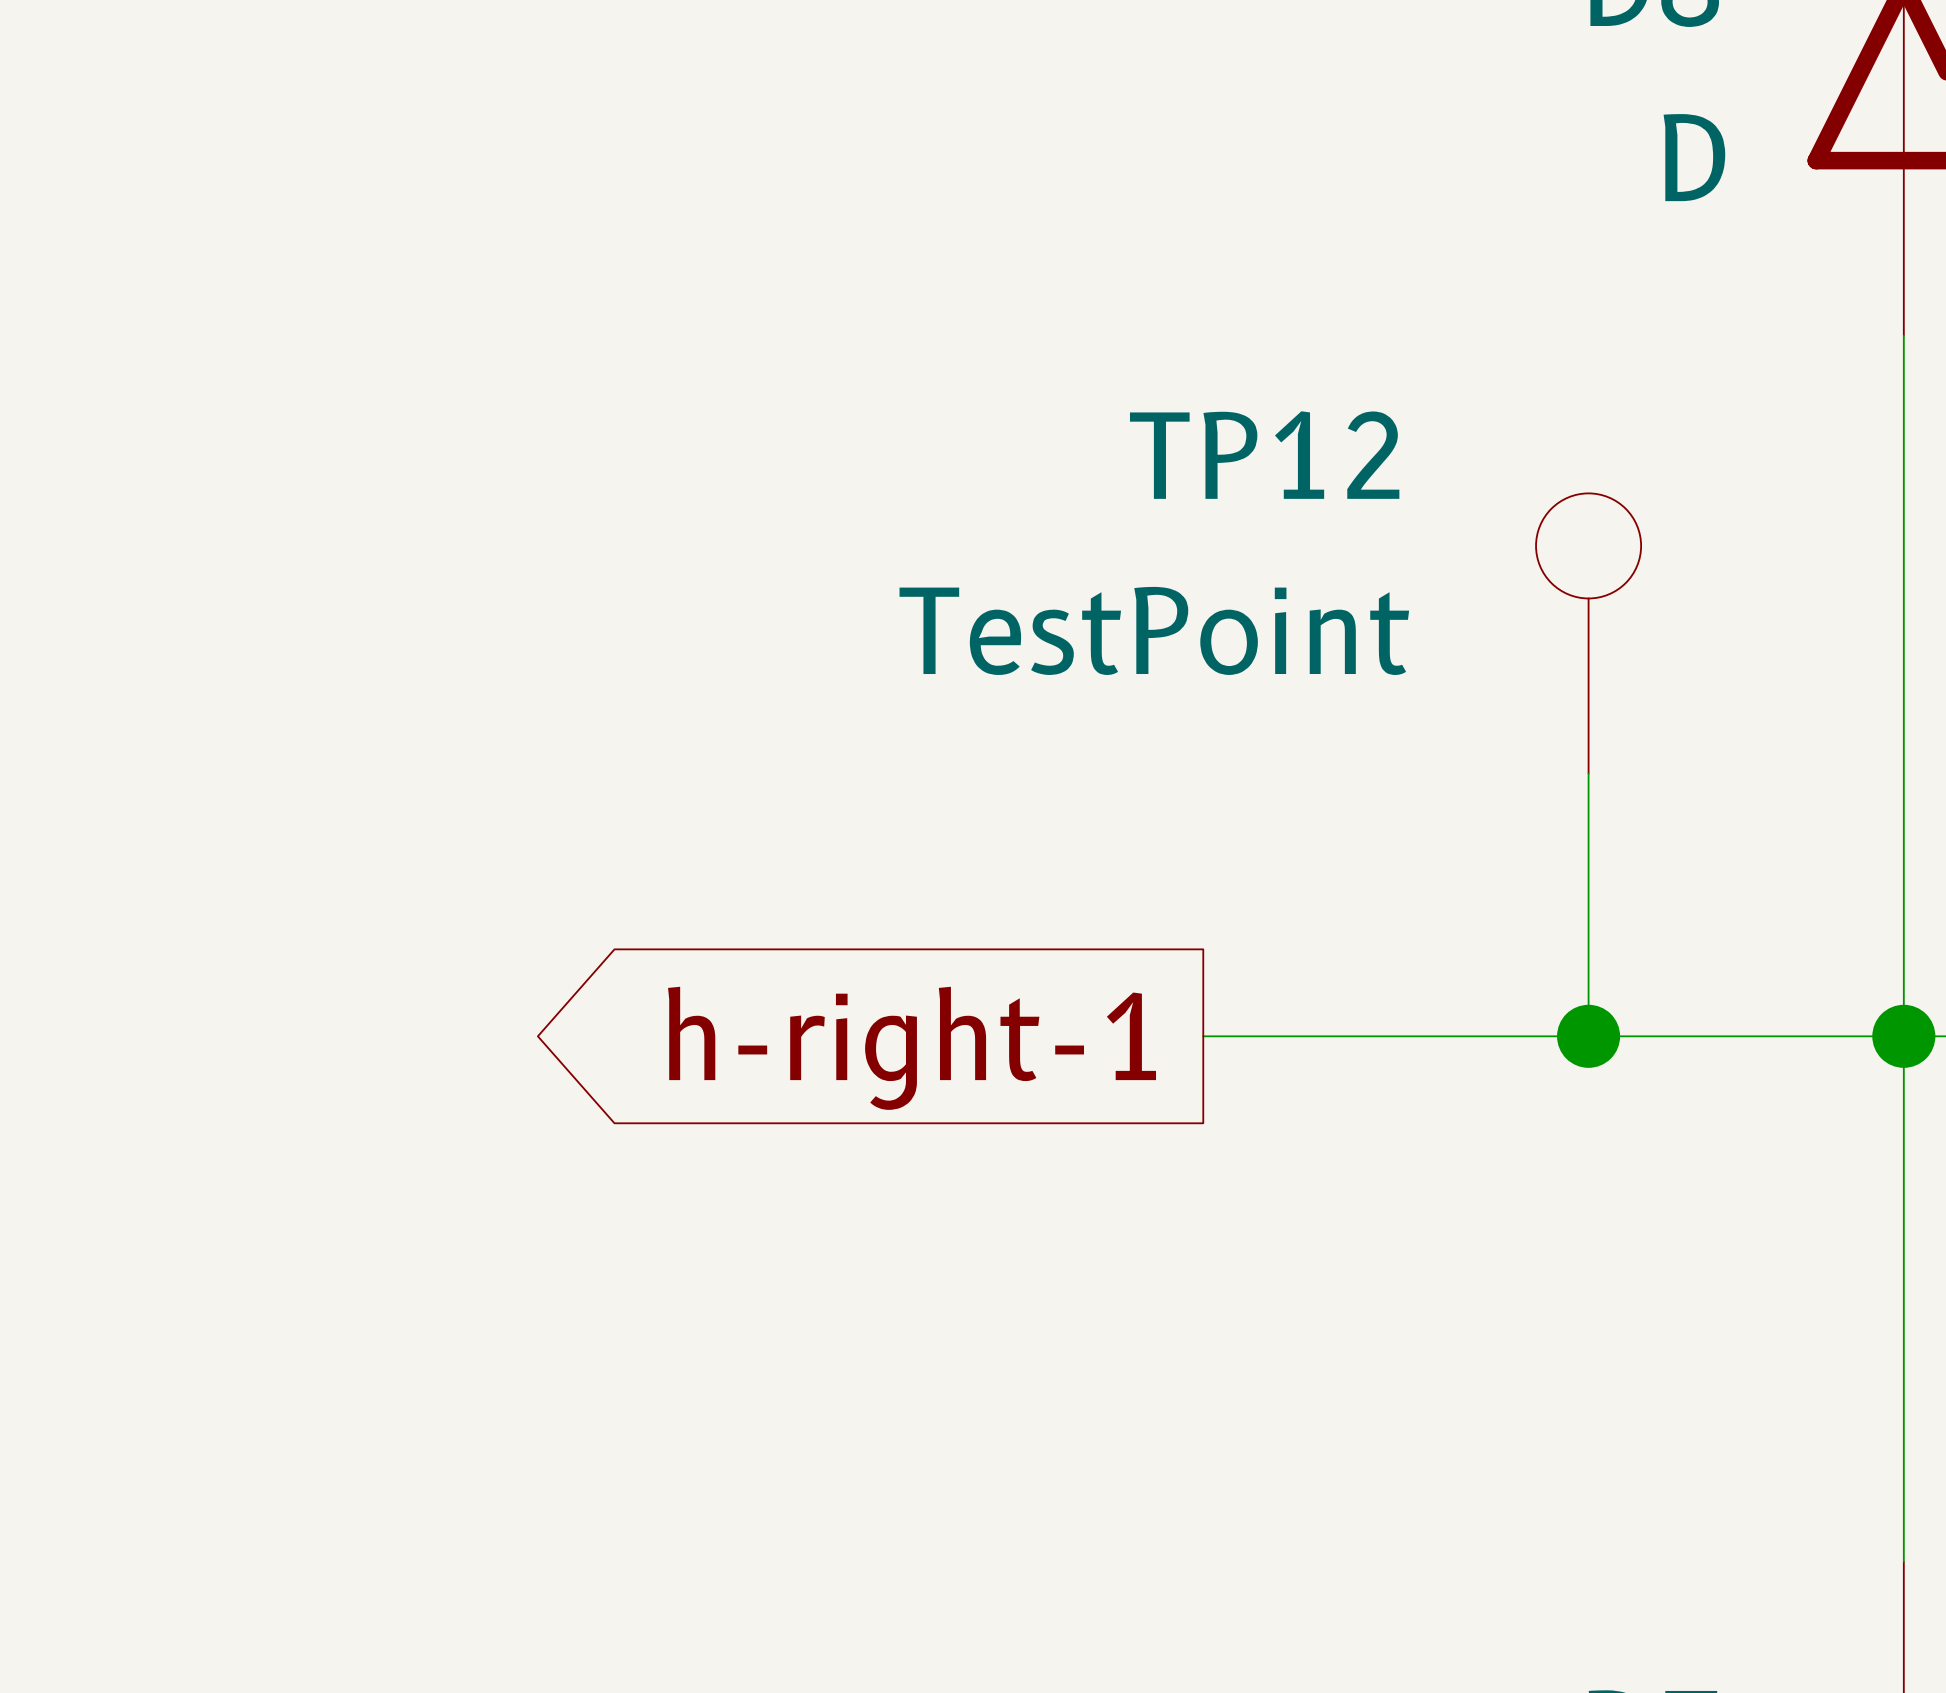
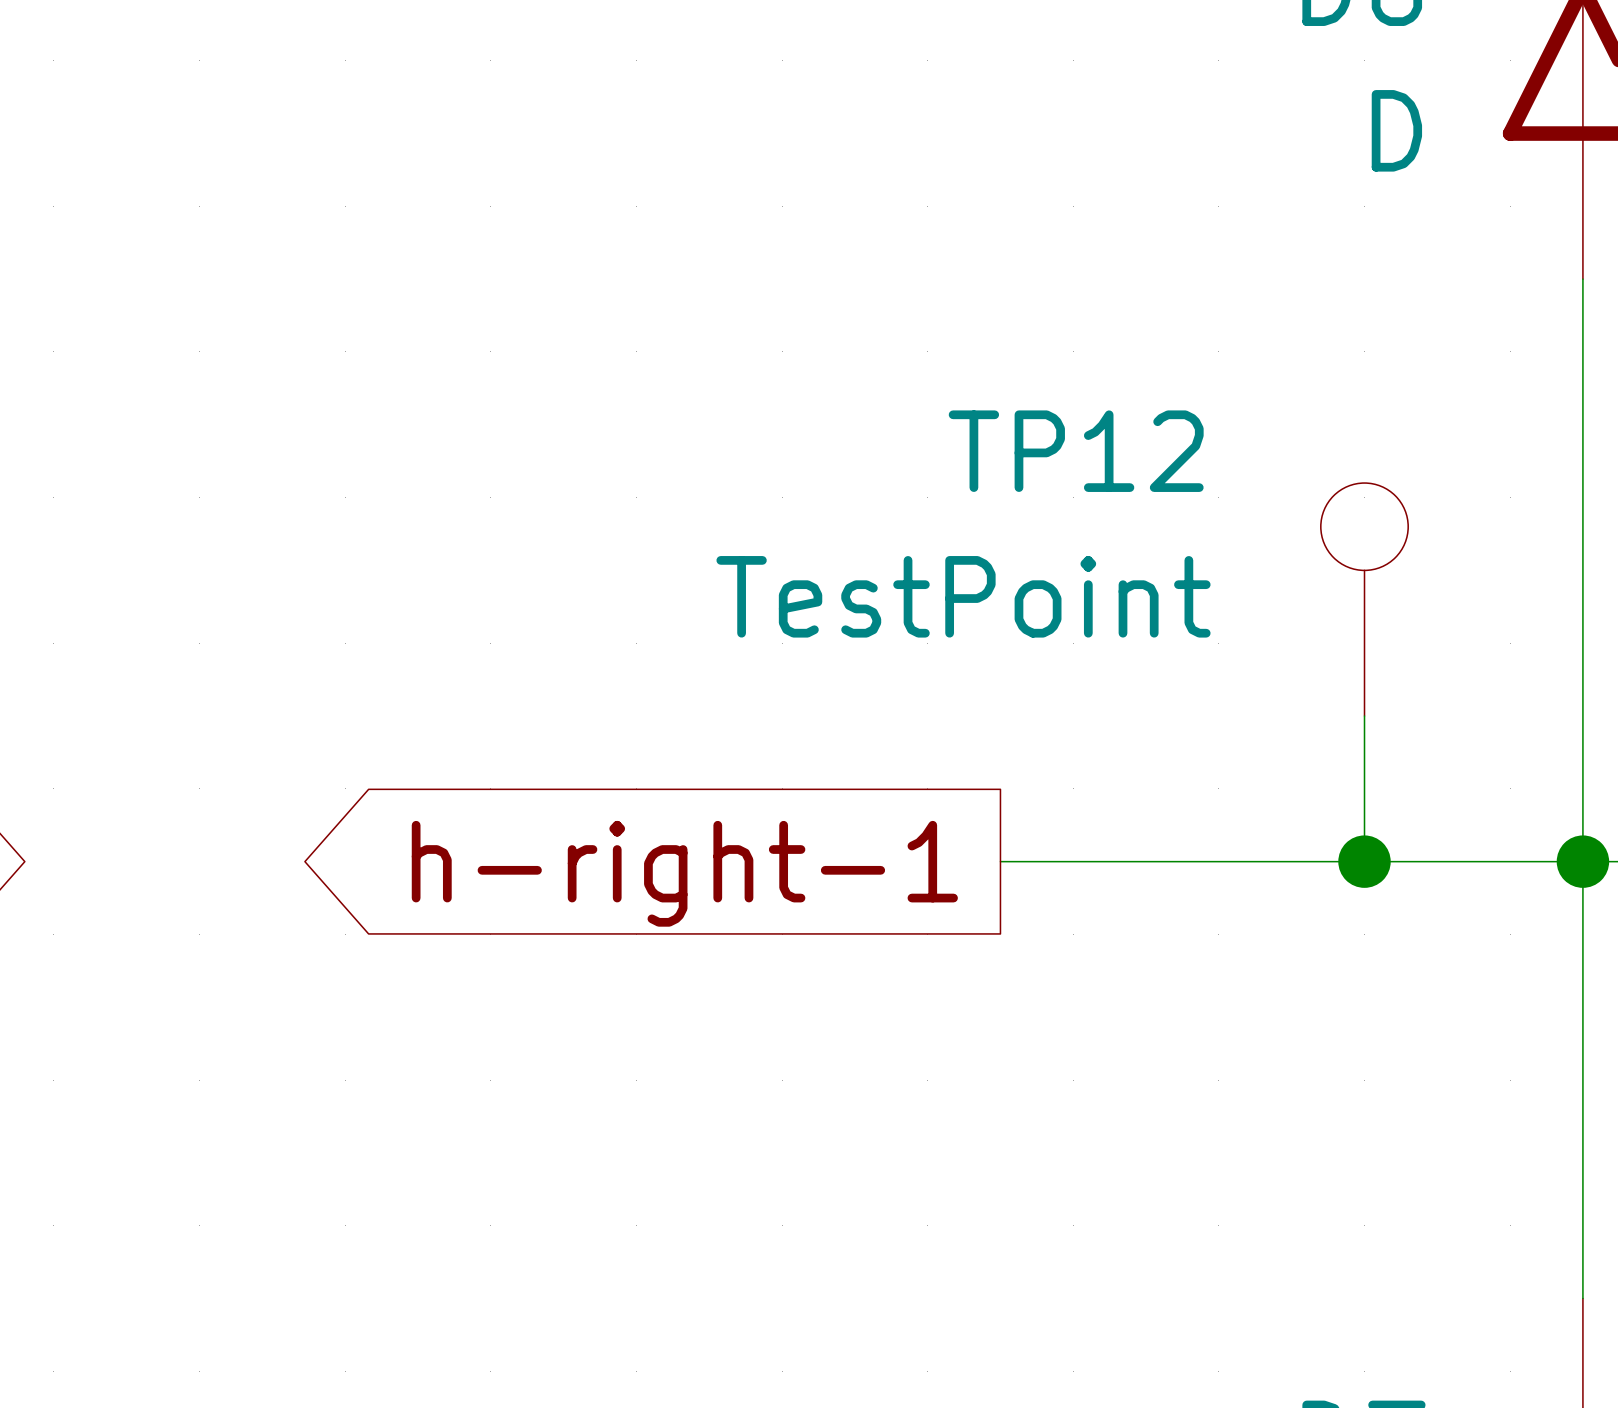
TP12 position: (1588, 633) -> (1364, 599)
wire: (1588, 773) (1588, 1036) -> none
wire: none -> (1364, 716) (1364, 861)
junction position: (1588, 1036) -> (1364, 861)

